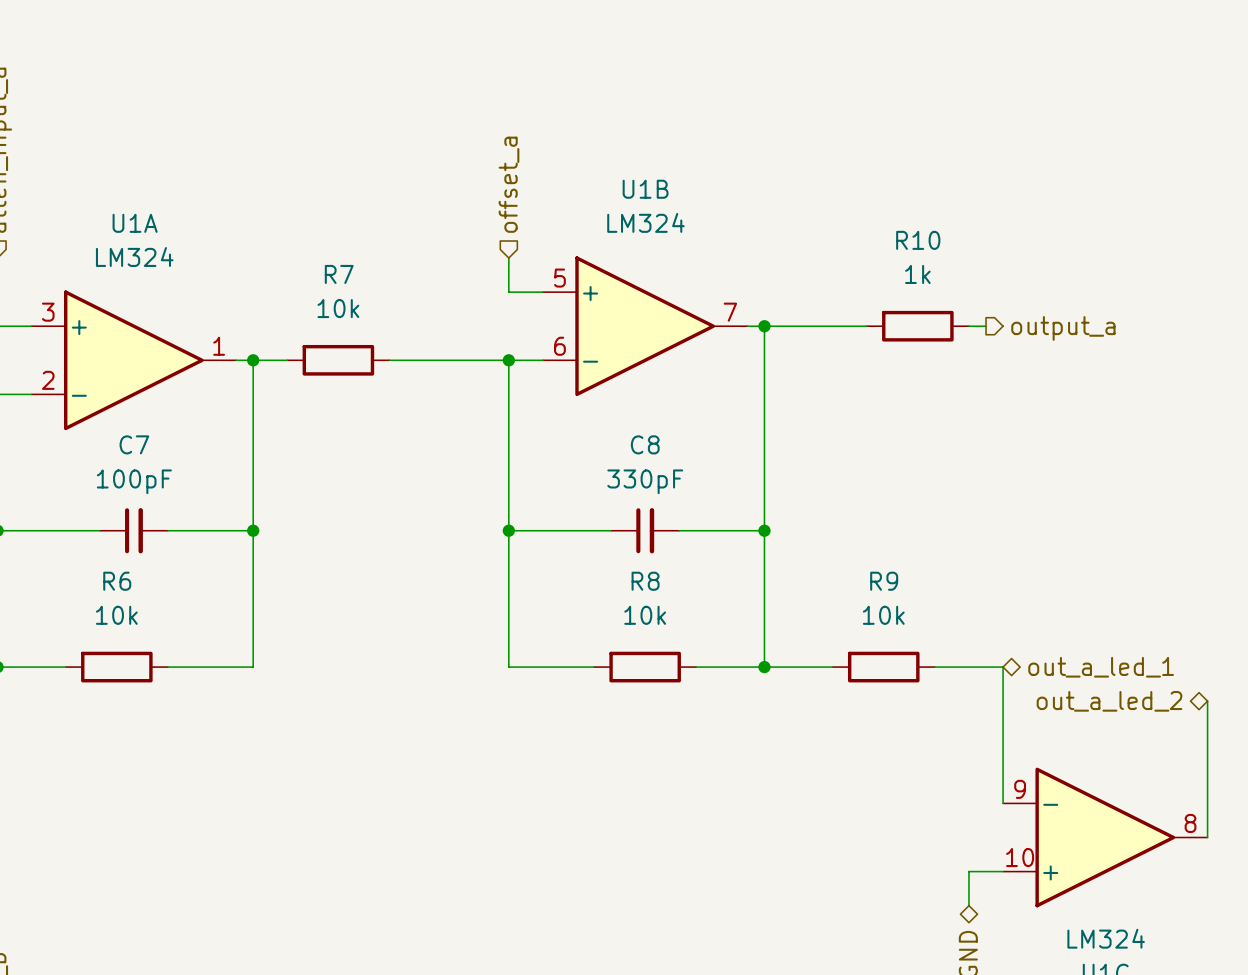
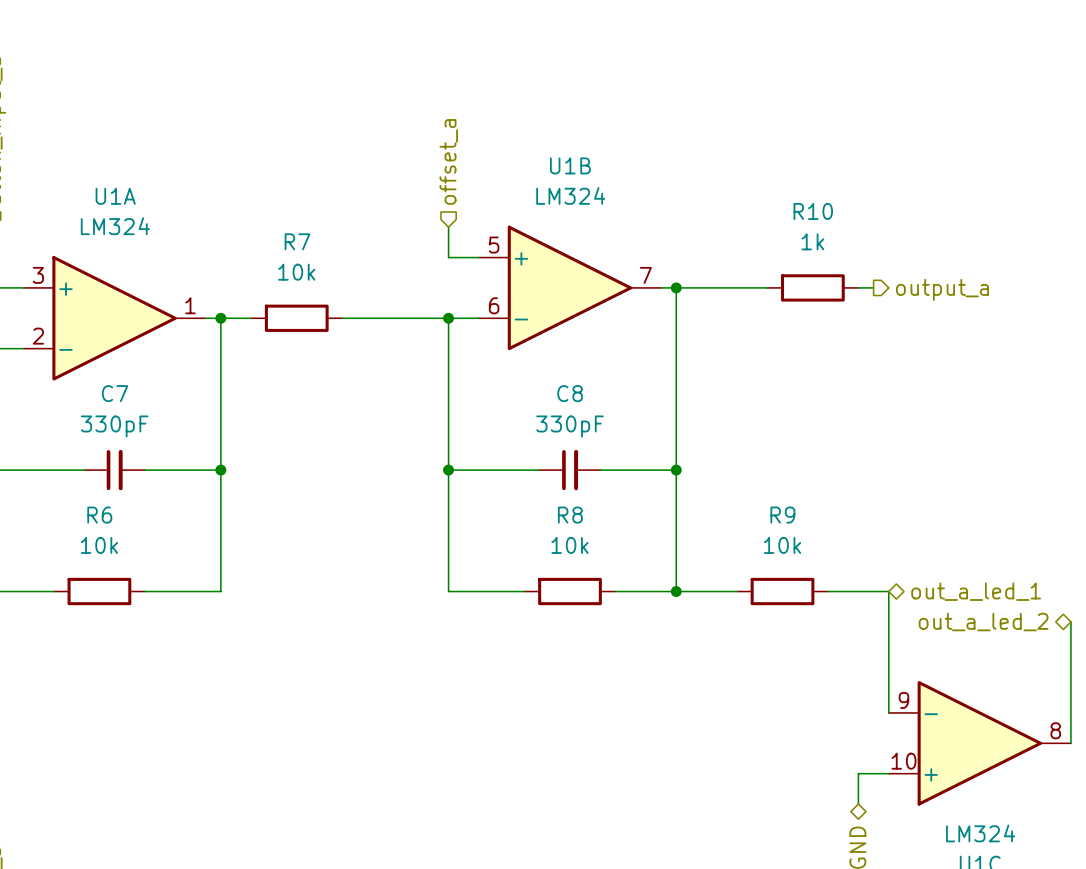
C7 value: 100pF (134, 481) -> 330pF (114, 426)

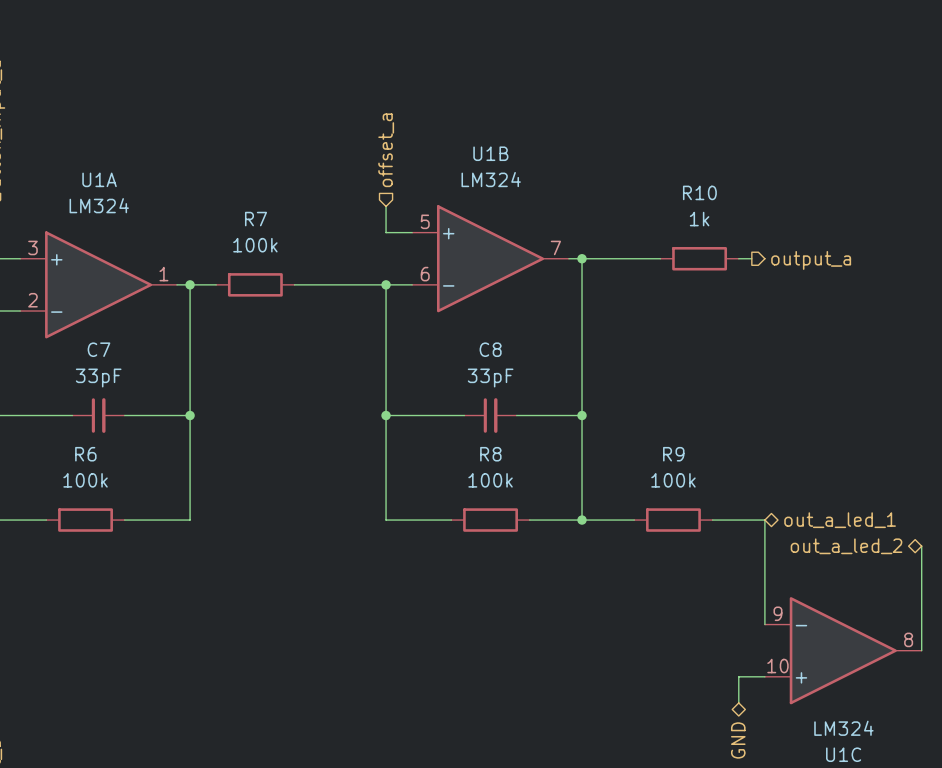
R7 value: 10k (296, 272) -> 100k (255, 245)
C7 value: 330pF (114, 426) -> 33pF (98, 378)
C8 value: 330pF (570, 426) -> 33pF (490, 378)
R6 value: 10k (99, 545) -> 100k (85, 480)
R8 value: 10k (570, 545) -> 100k (490, 480)
R9 value: 10k (782, 545) -> 100k (673, 480)

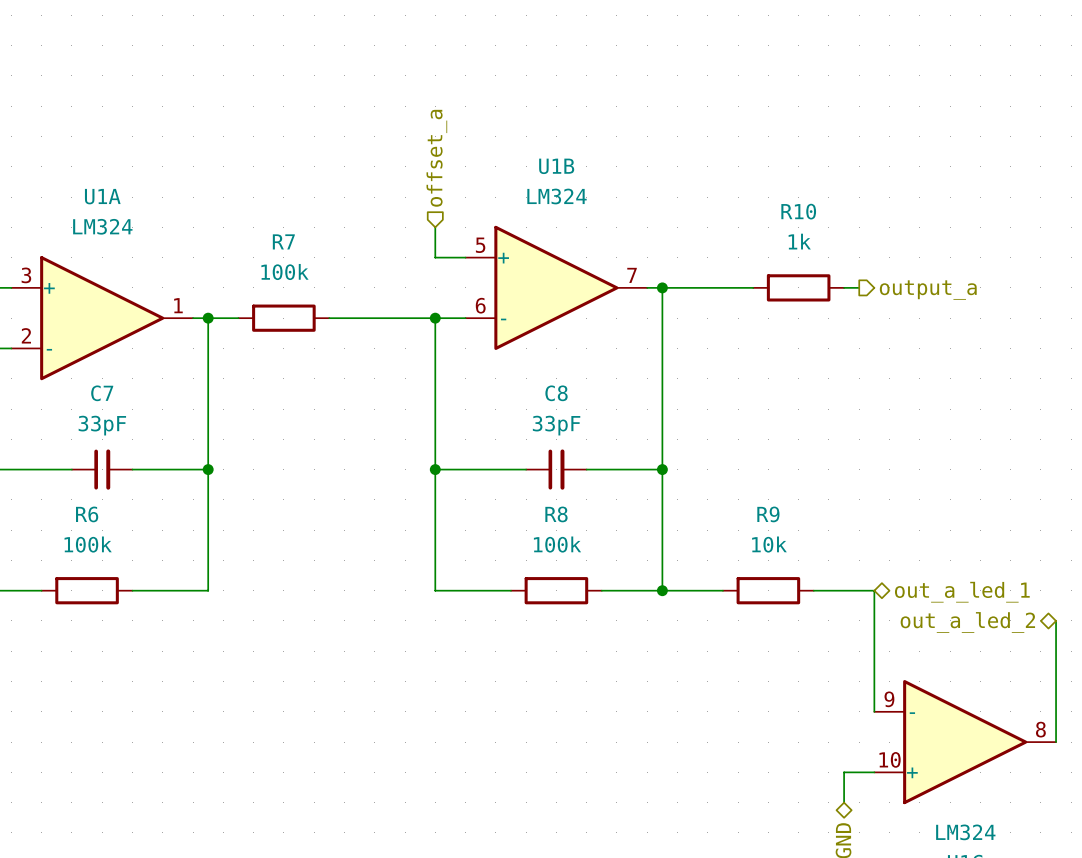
R9 value: 100k (673, 480) -> 10k (769, 544)

